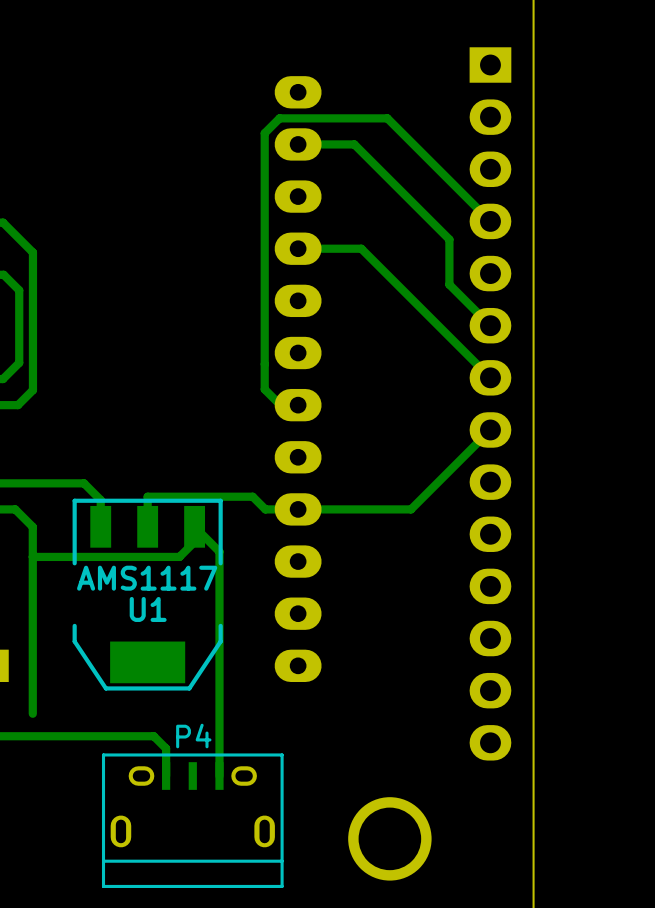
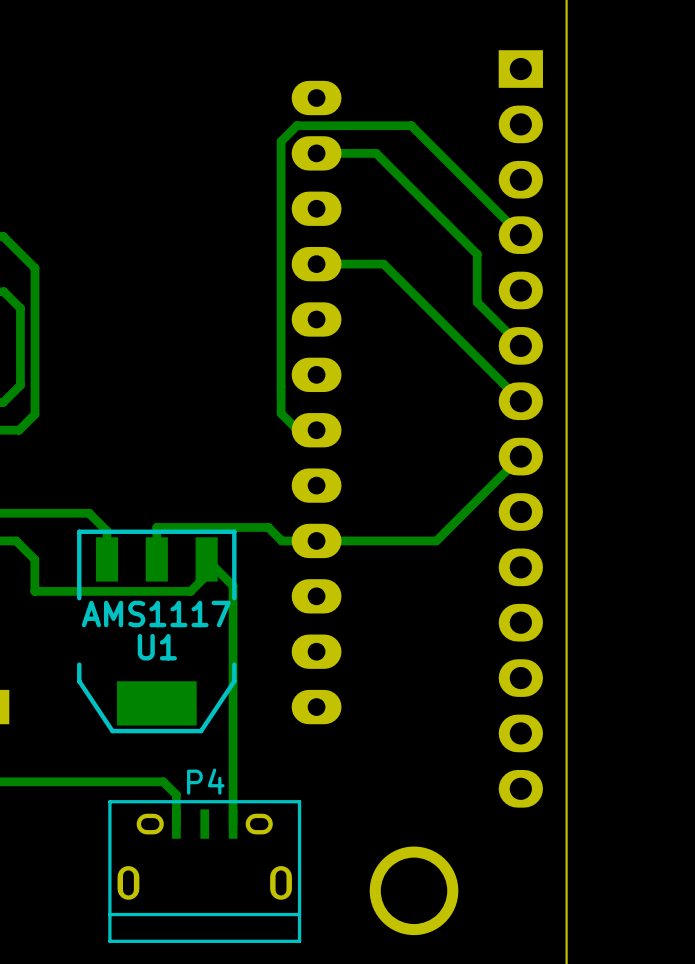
track: (32, 556) (32, 713) -> none

